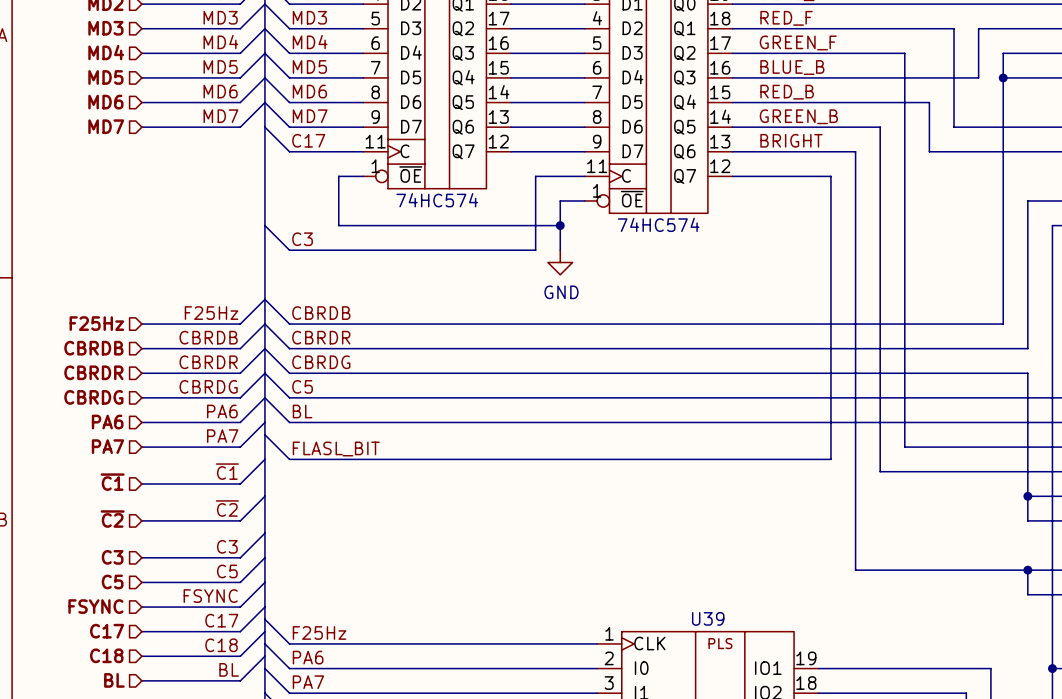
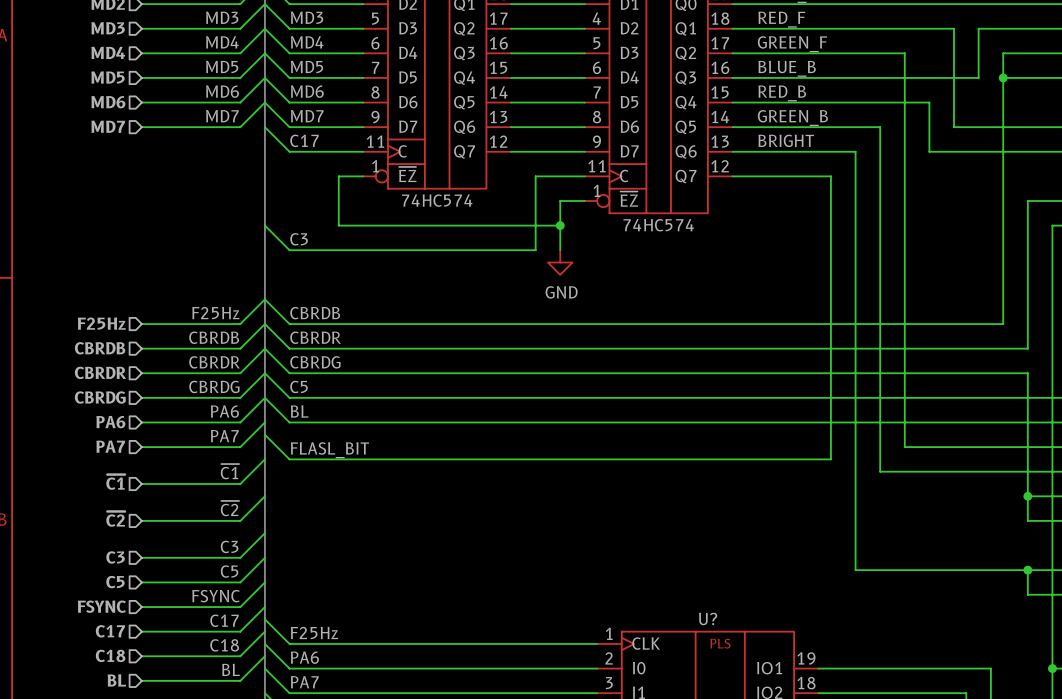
part pin name: ~{OE} (410, 174) -> ~{EZ} (407, 174)
part pin name: ~{OE} (632, 199) -> ~{EZ} (629, 199)
U39 name: U39 (708, 618) -> U? (708, 618)

